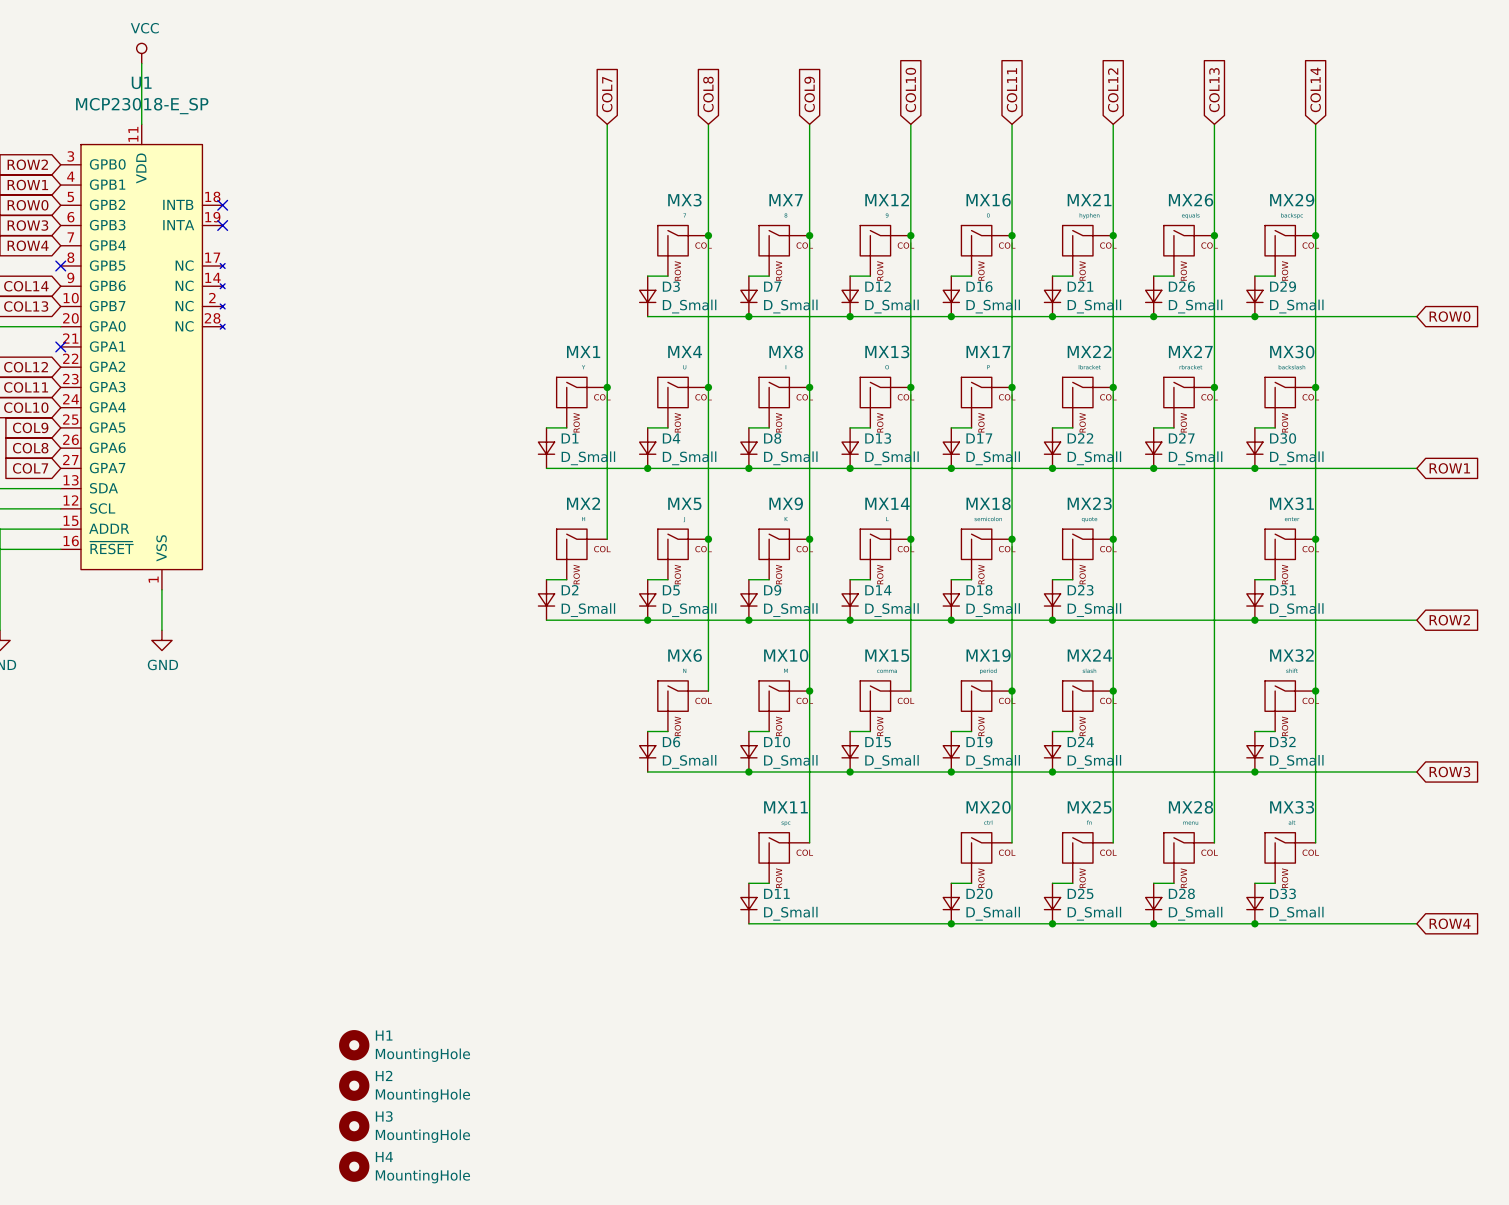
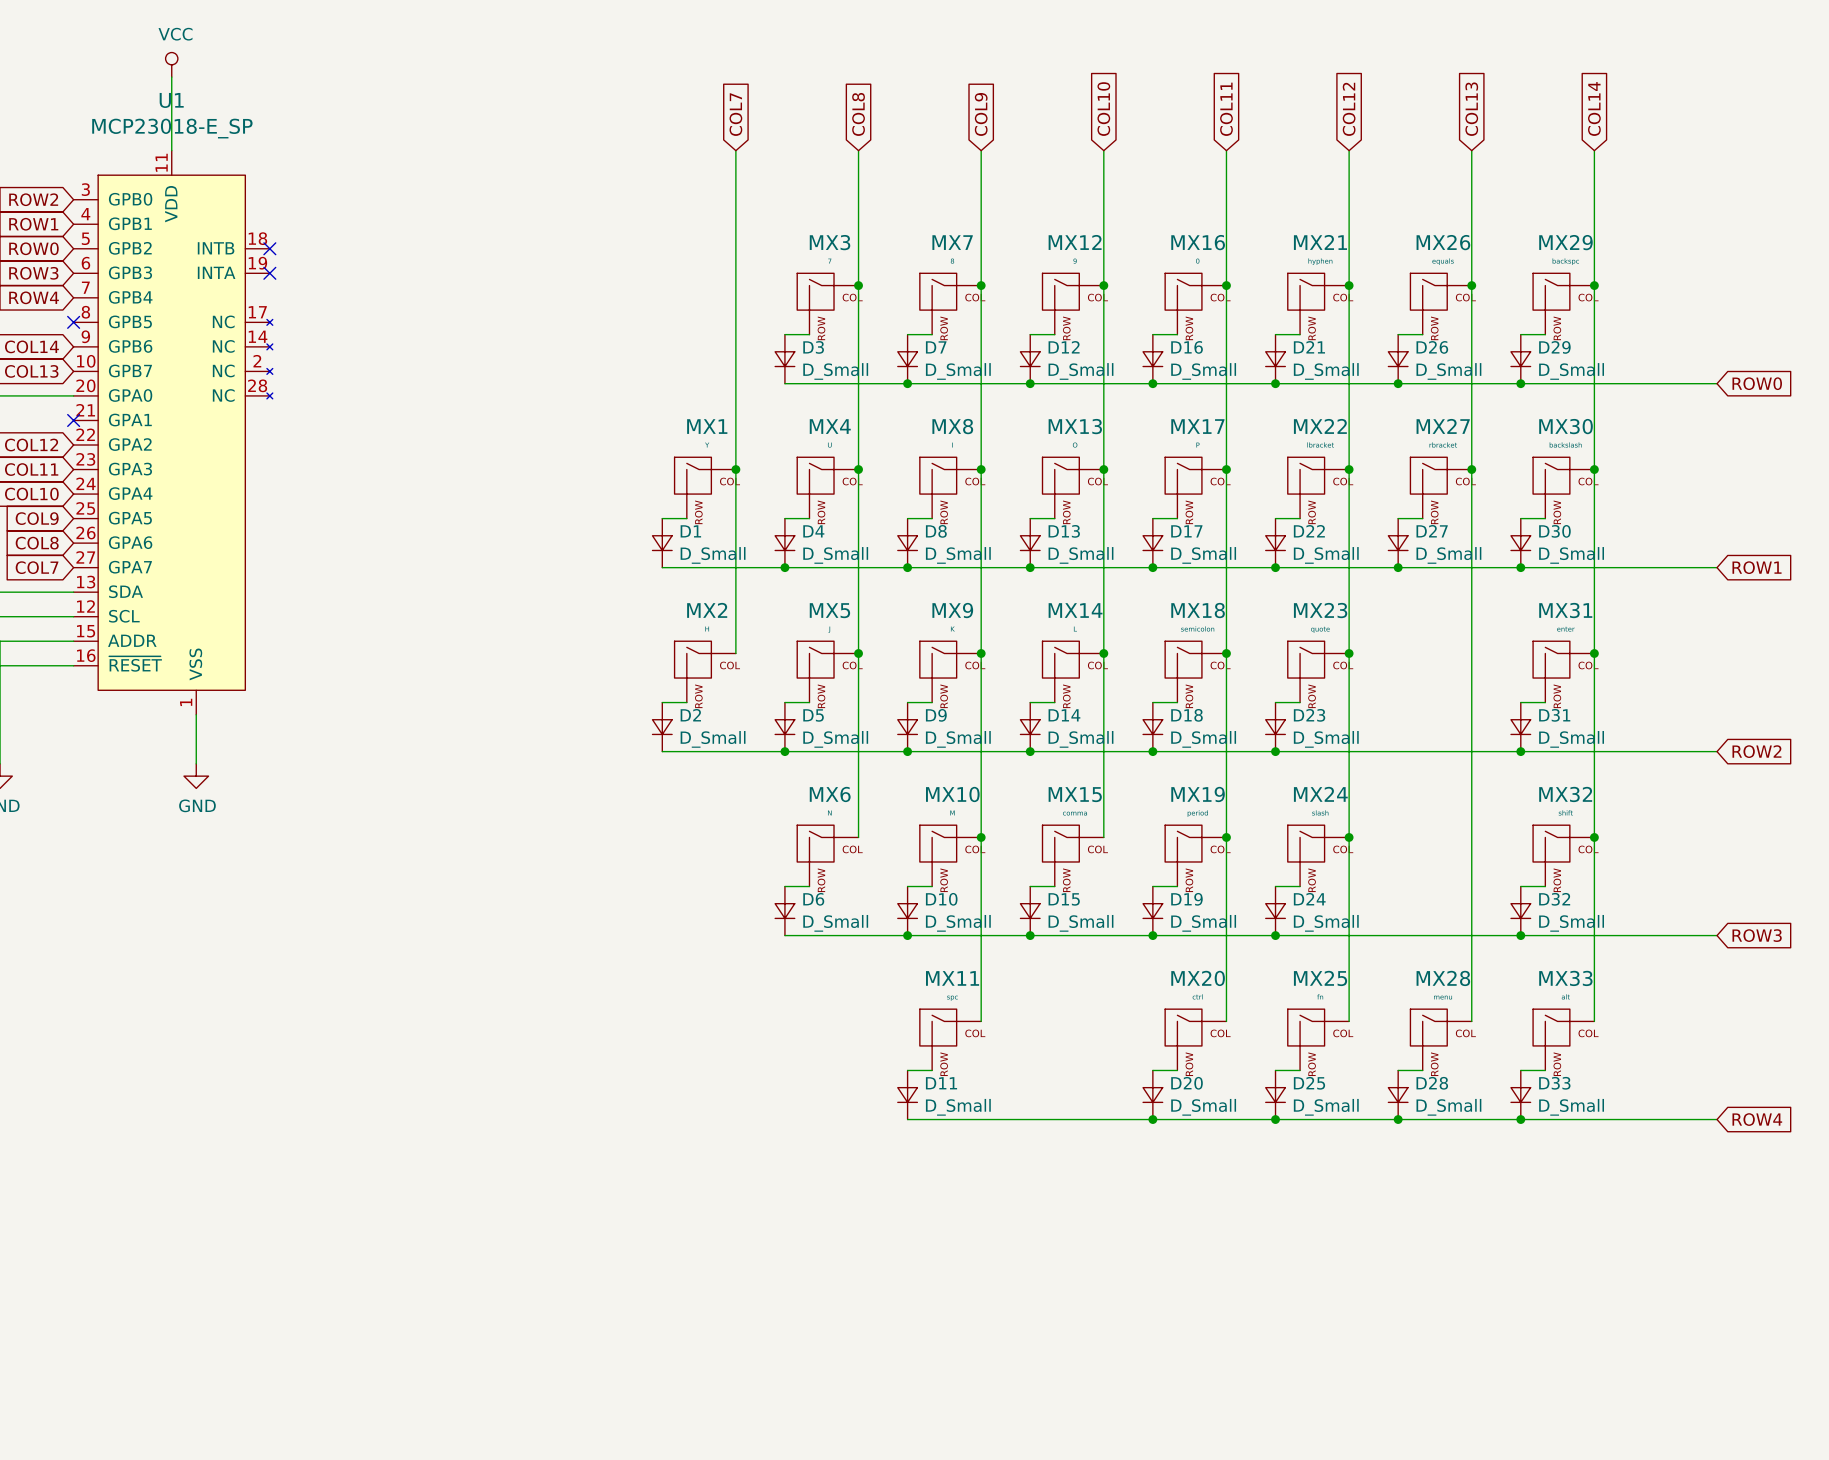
H1: MountingHole (354, 1045) -> none
H2: MountingHole (354, 1085) -> none
H3: MountingHole (354, 1126) -> none
H4: MountingHole (354, 1166) -> none

